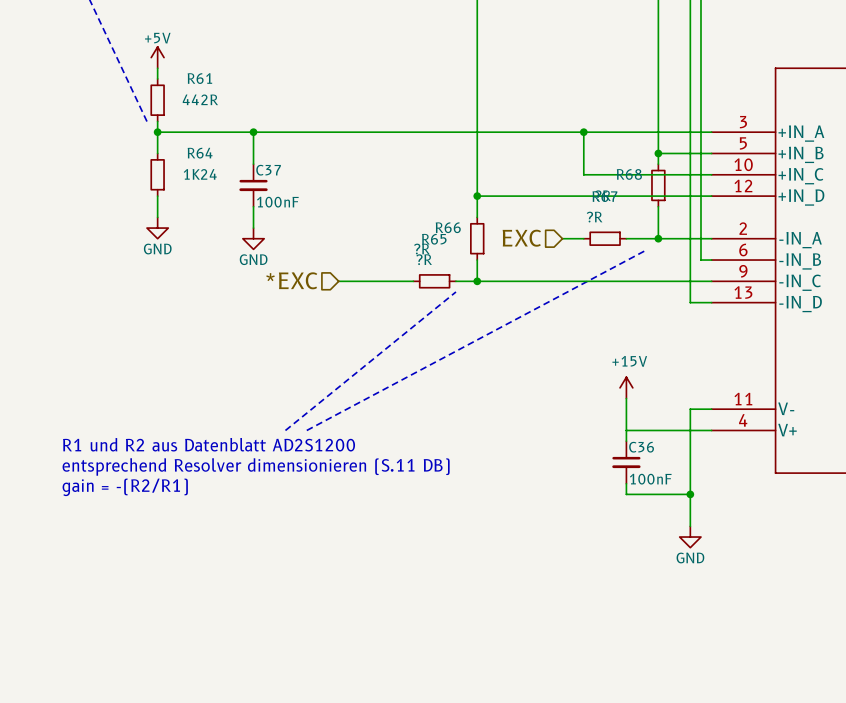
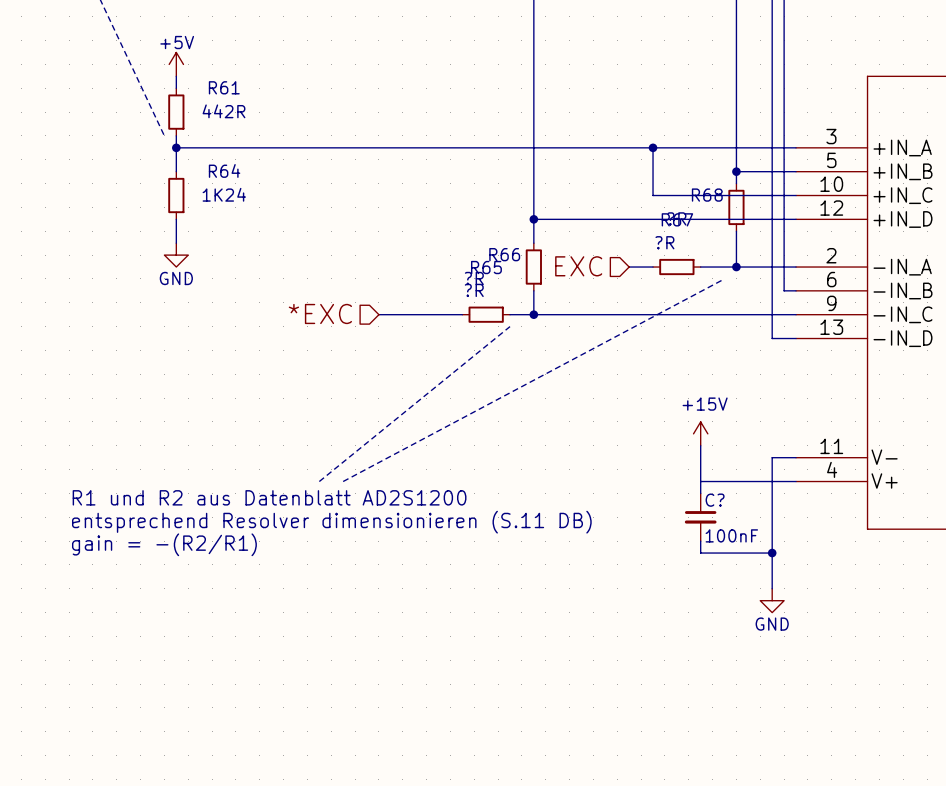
wire: (253, 132) (253, 164) -> none
junction: (253, 132) -> none
C37: 100nF (253, 185) -> none
wire: (253, 206) (253, 228) -> none
power symbol: GND (253, 238) -> none
C36 name: C36 (641, 447) -> C? (715, 500)

